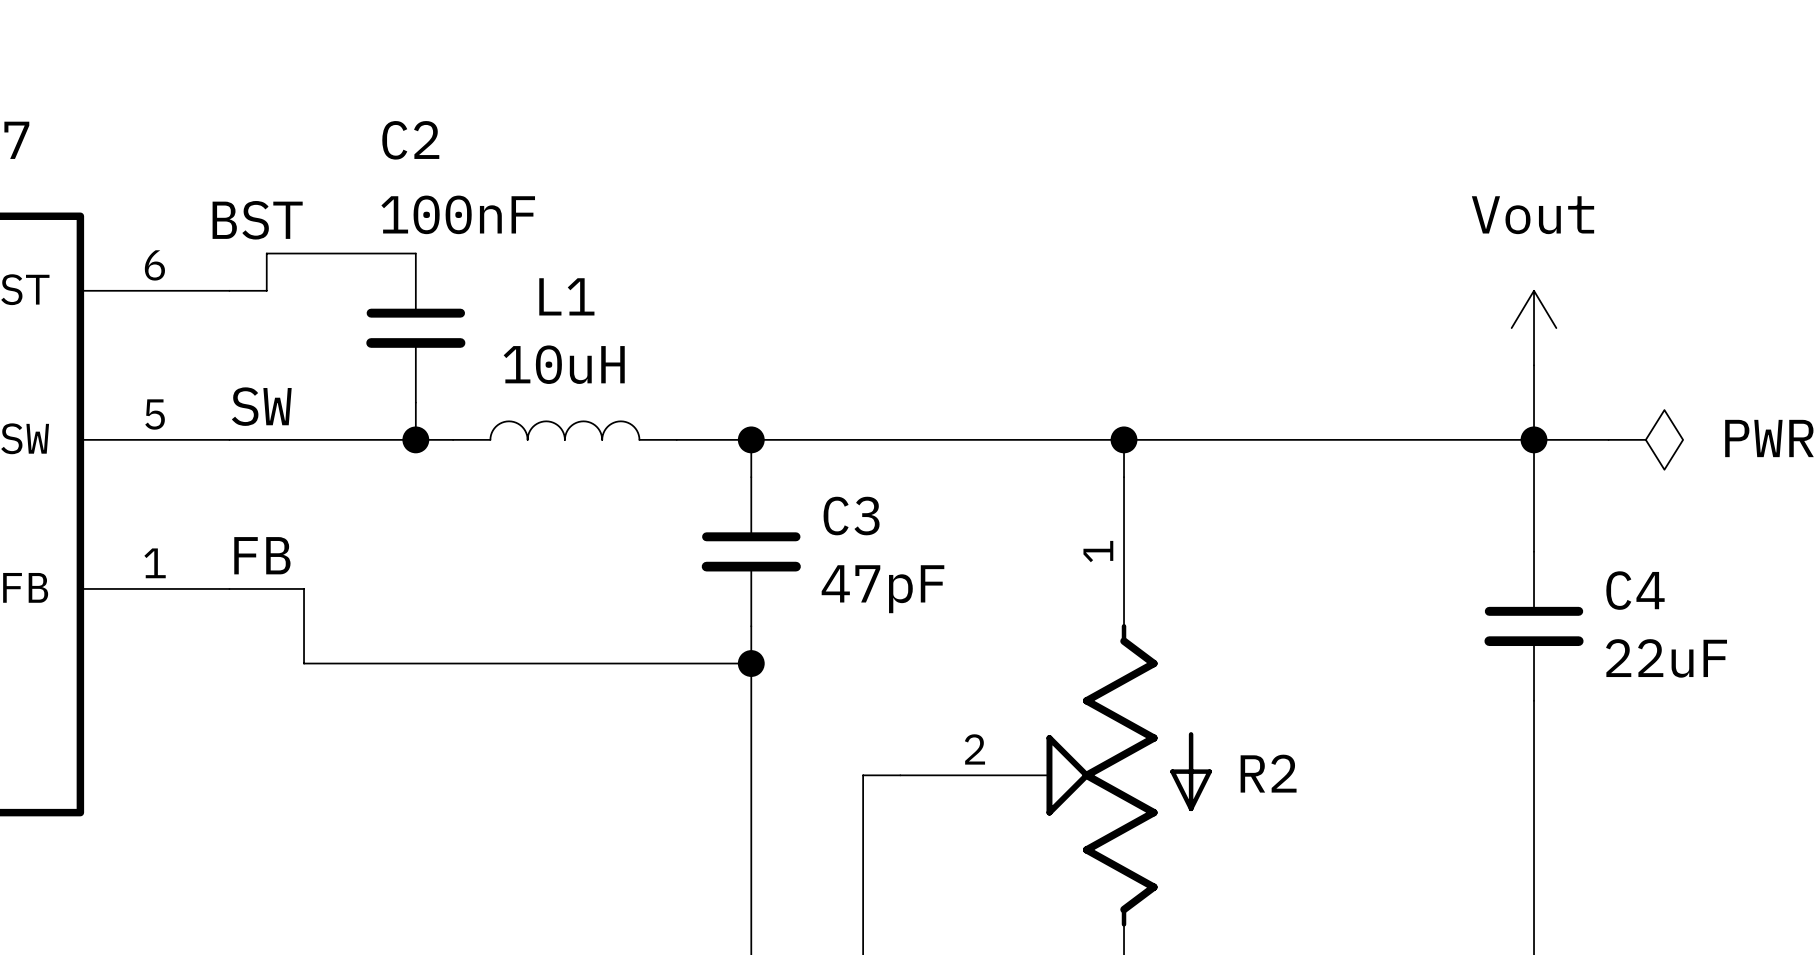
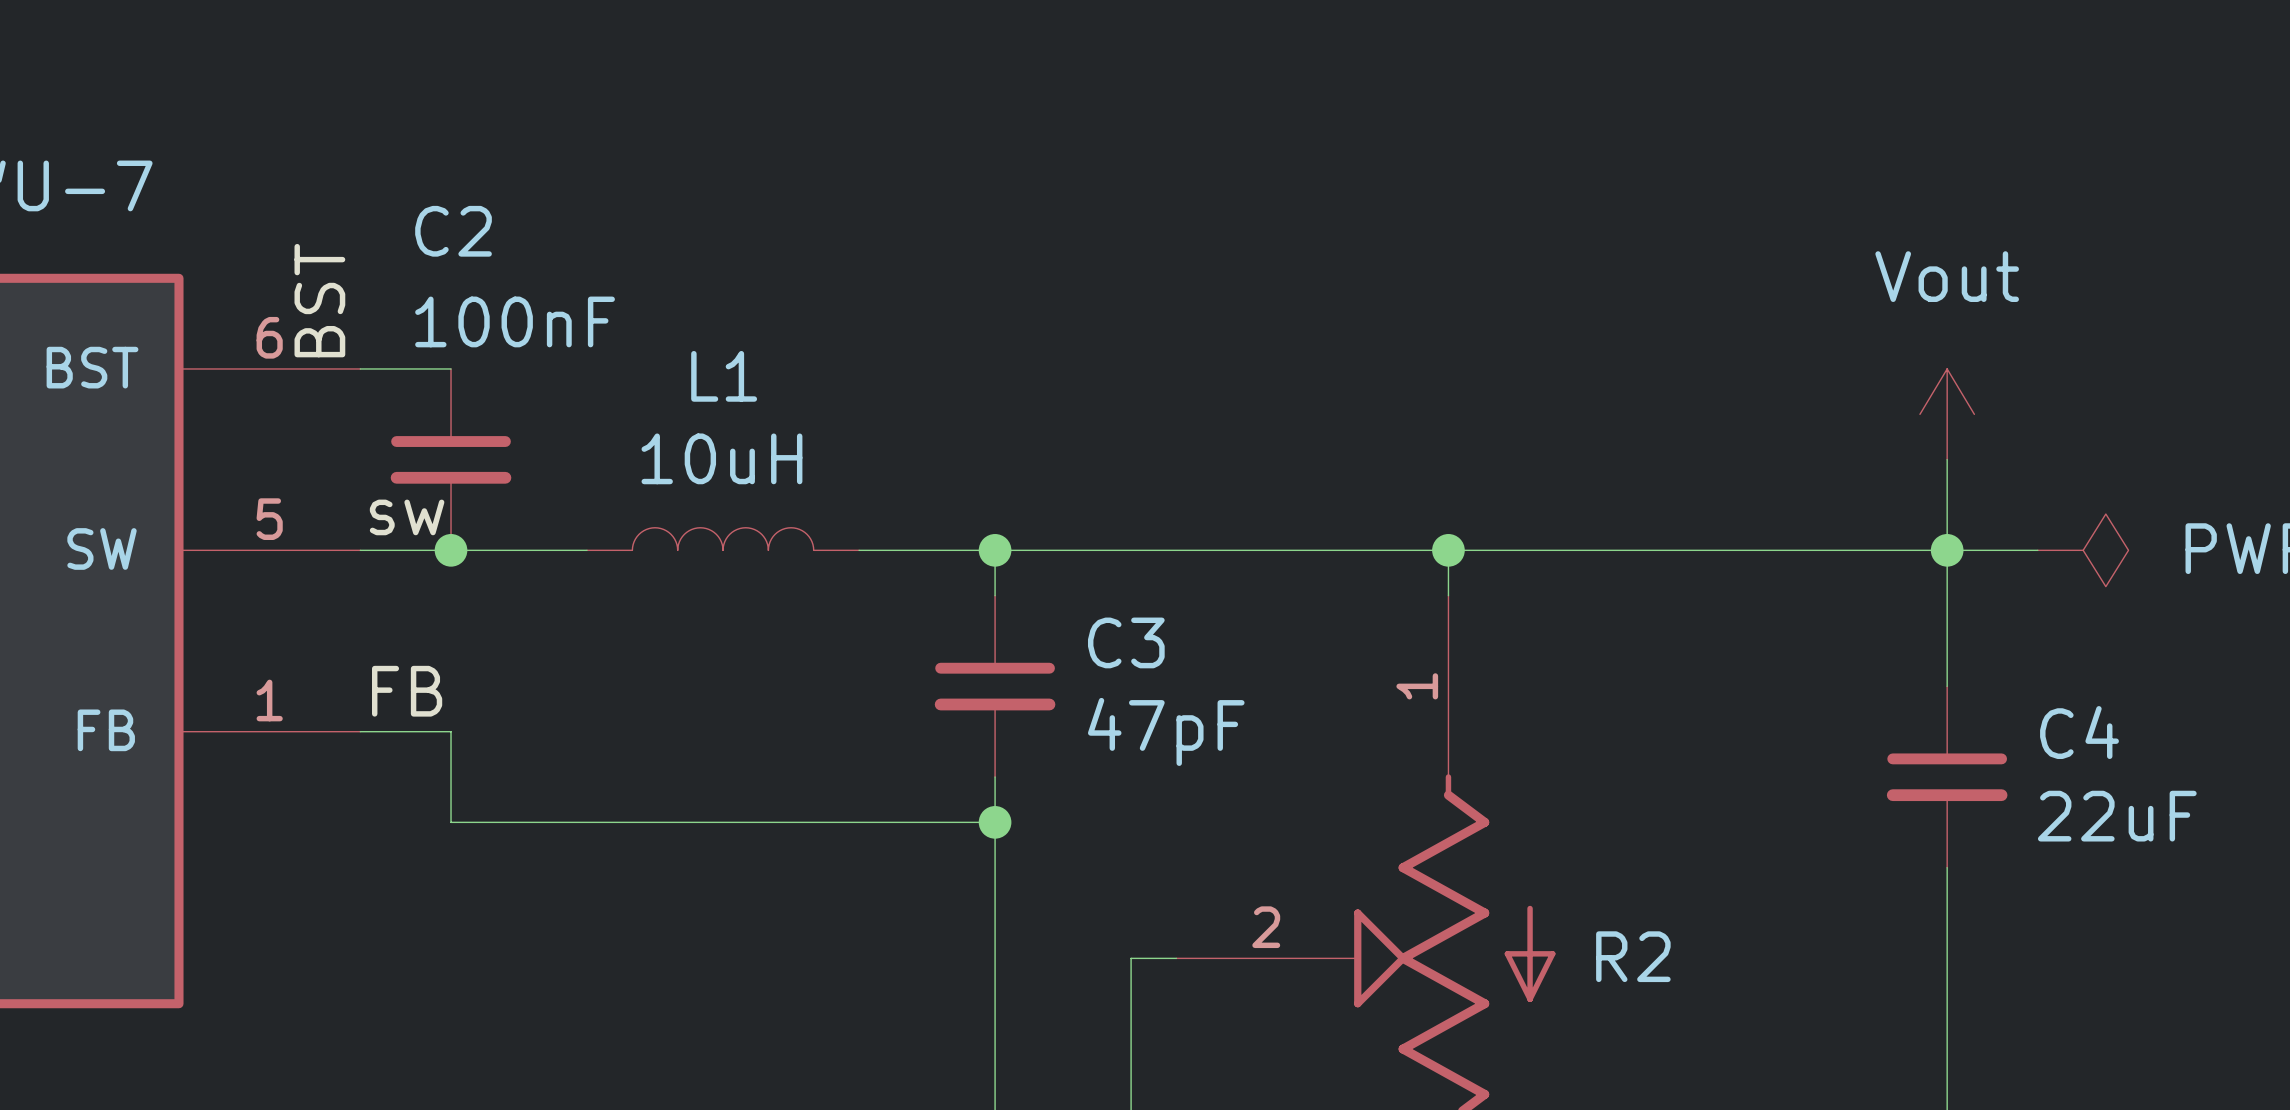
label rotation: 0° (257, 220) -> 90° counterclockwise (319, 300)
wire: (415, 253) (266, 253) (266, 290) -> (451, 368) (405, 368)
C2 position: (415, 328) -> (451, 459)
wire: (415, 402) (415, 439) (453, 439) -> none
label: SW (261, 406) -> sw (407, 517)
L1 position: (564, 430) -> (723, 539)
junction position: (415, 439) -> (451, 550)

